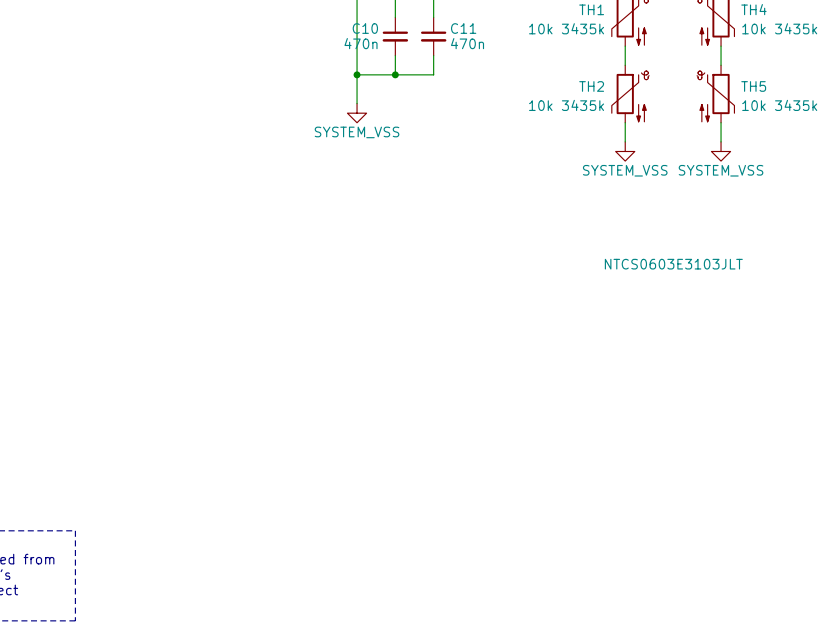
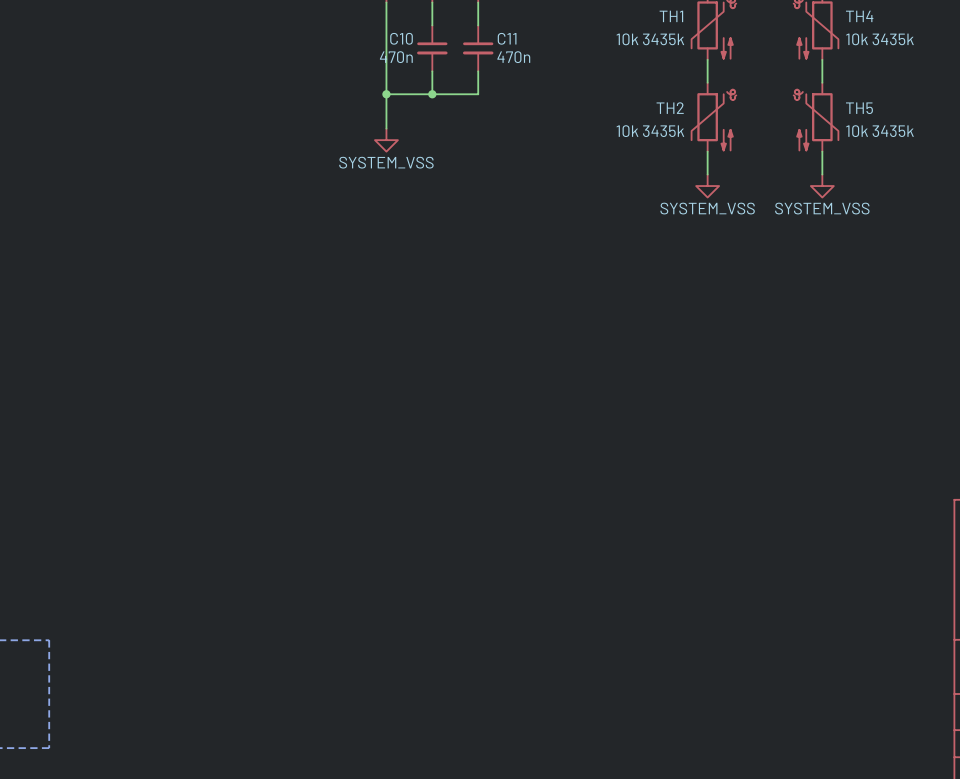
TH1 text: NTCS0603E3103JLT (673, 264) -> none

